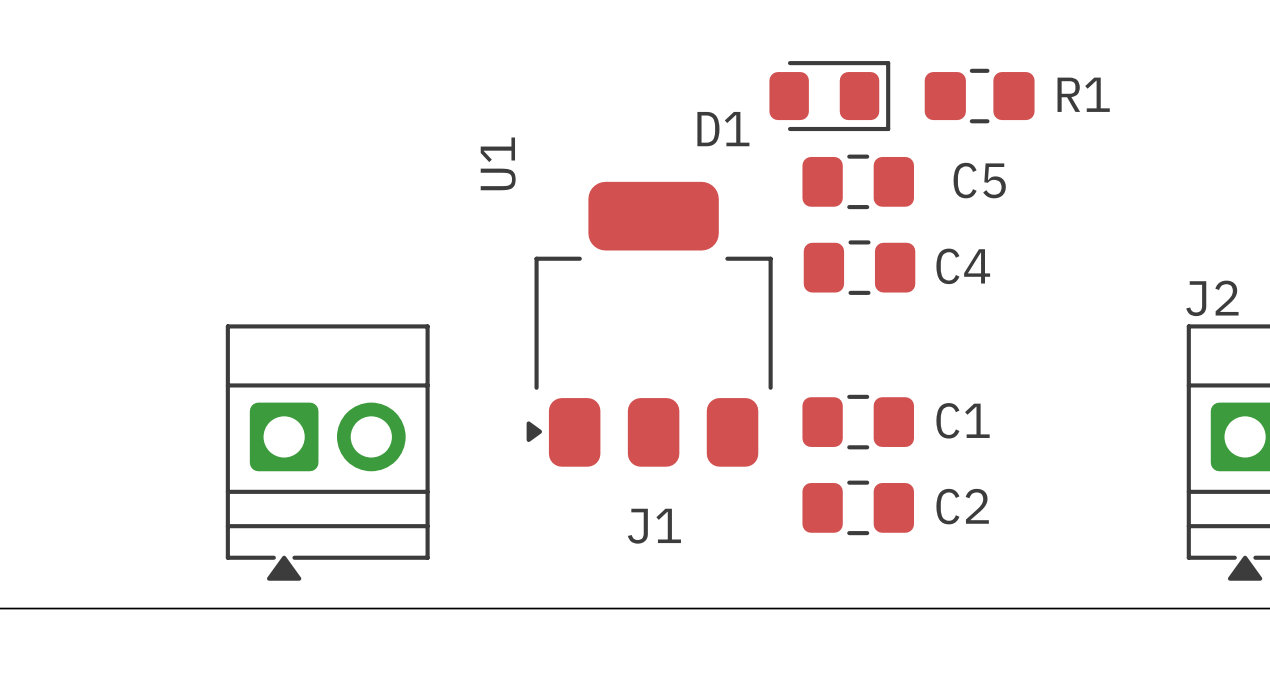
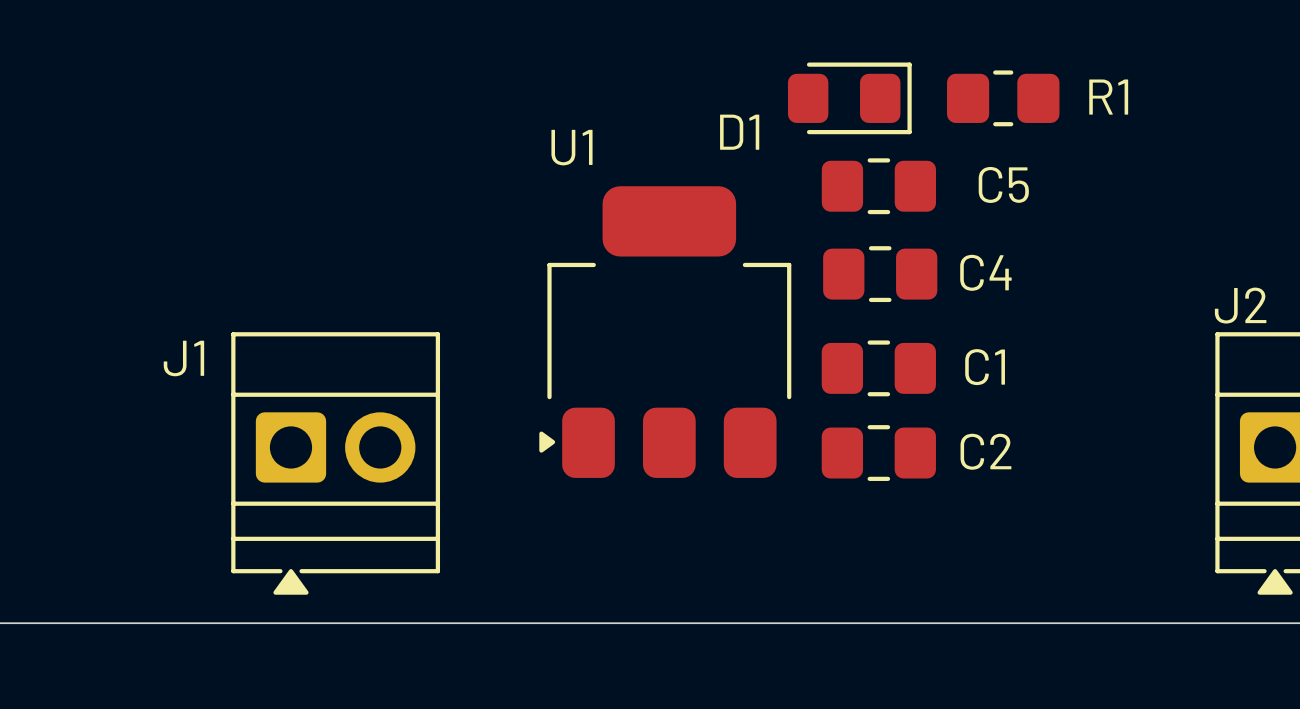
U1 name rotation: 0° (498, 163) -> 90° clockwise (571, 147)
C1 position: (858, 422) -> (878, 368)
C2 position: (858, 507) -> (878, 453)
J1 name position: J1 (654, 526) -> J1 (183, 358)

